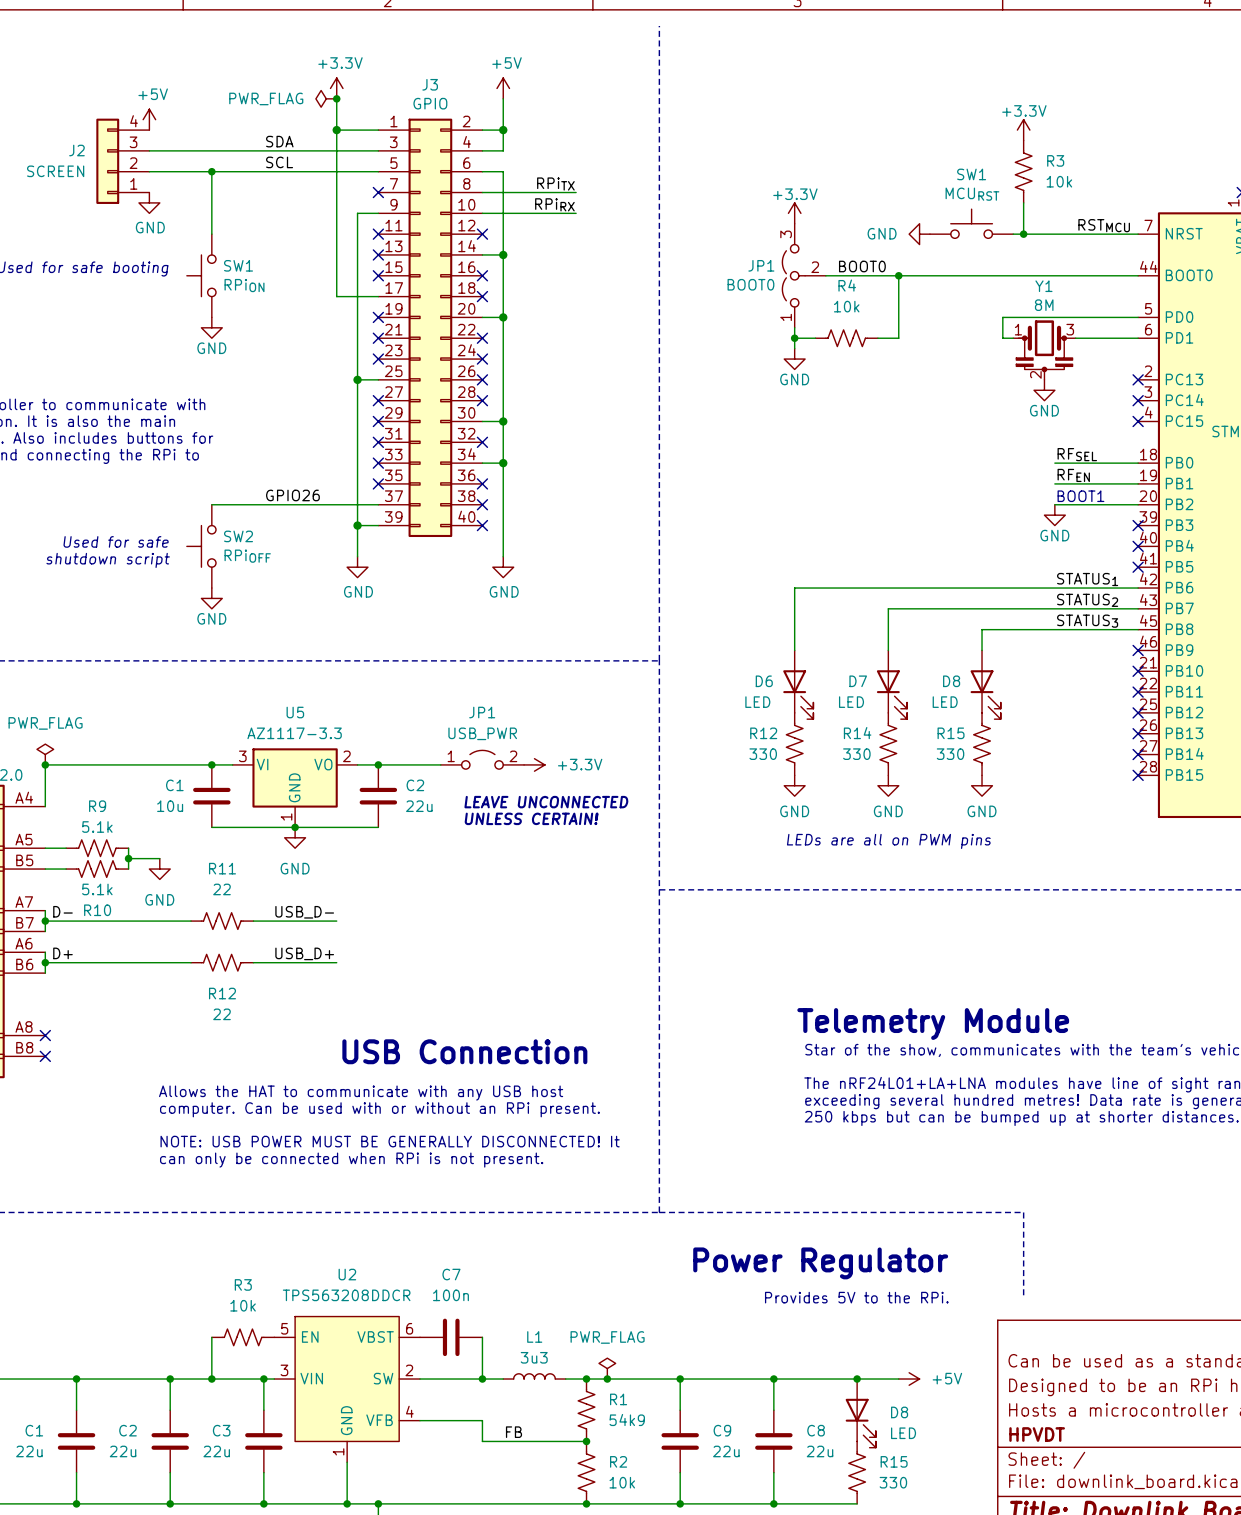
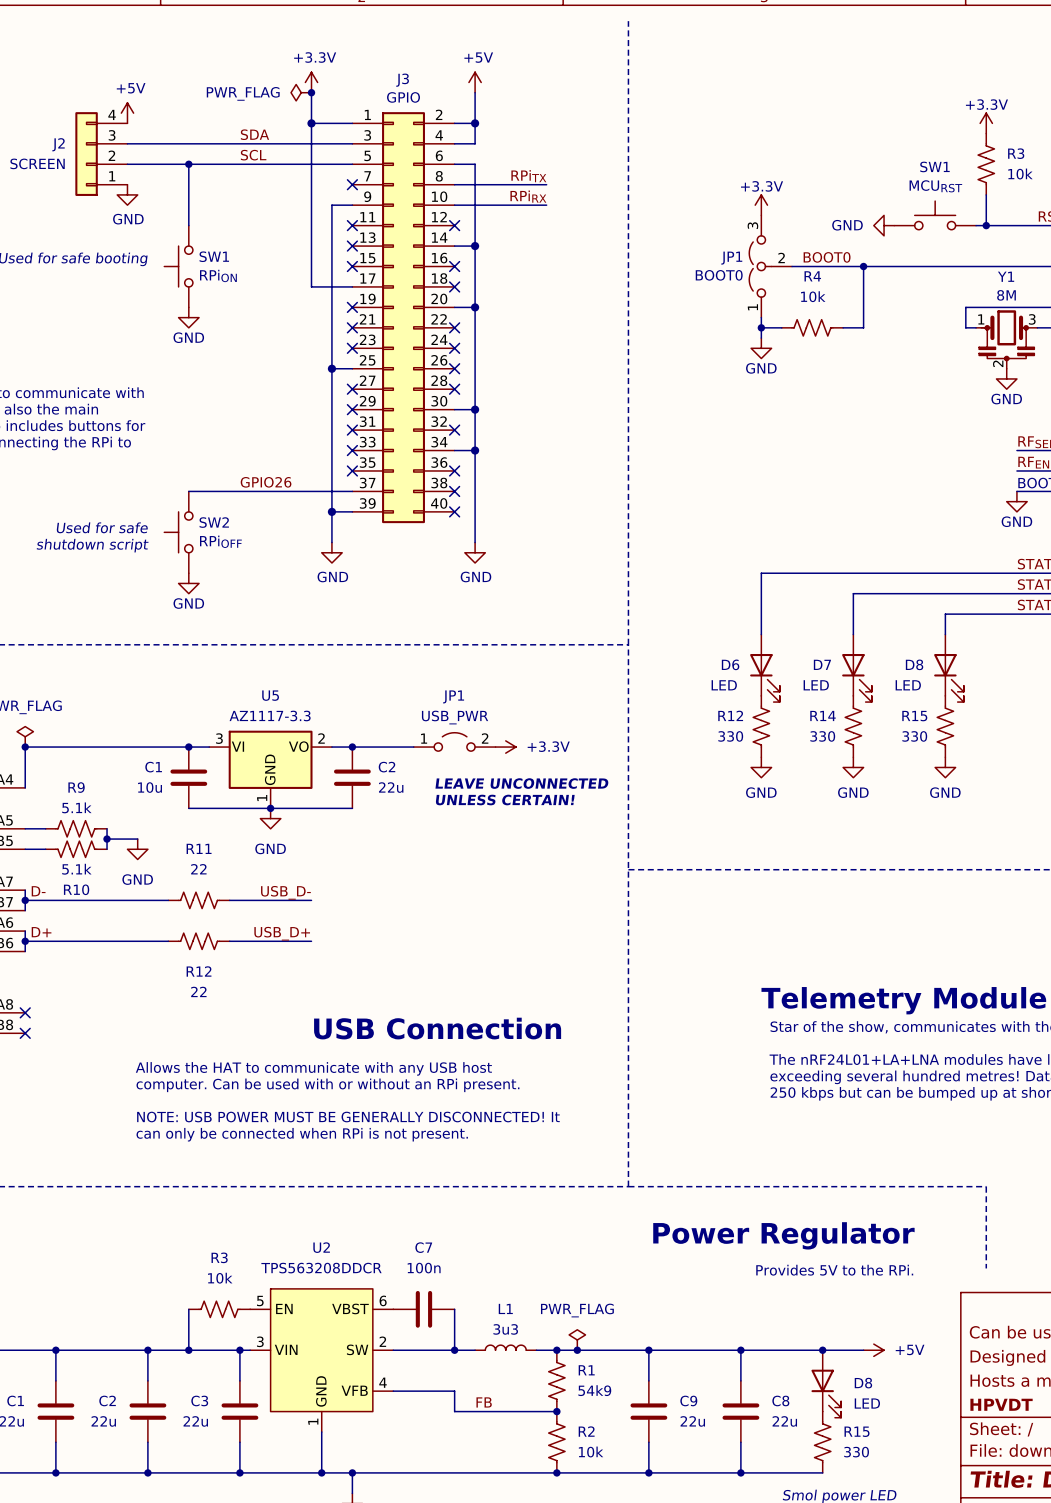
text: LEDs are all on PWM pins (888, 841) -> none

